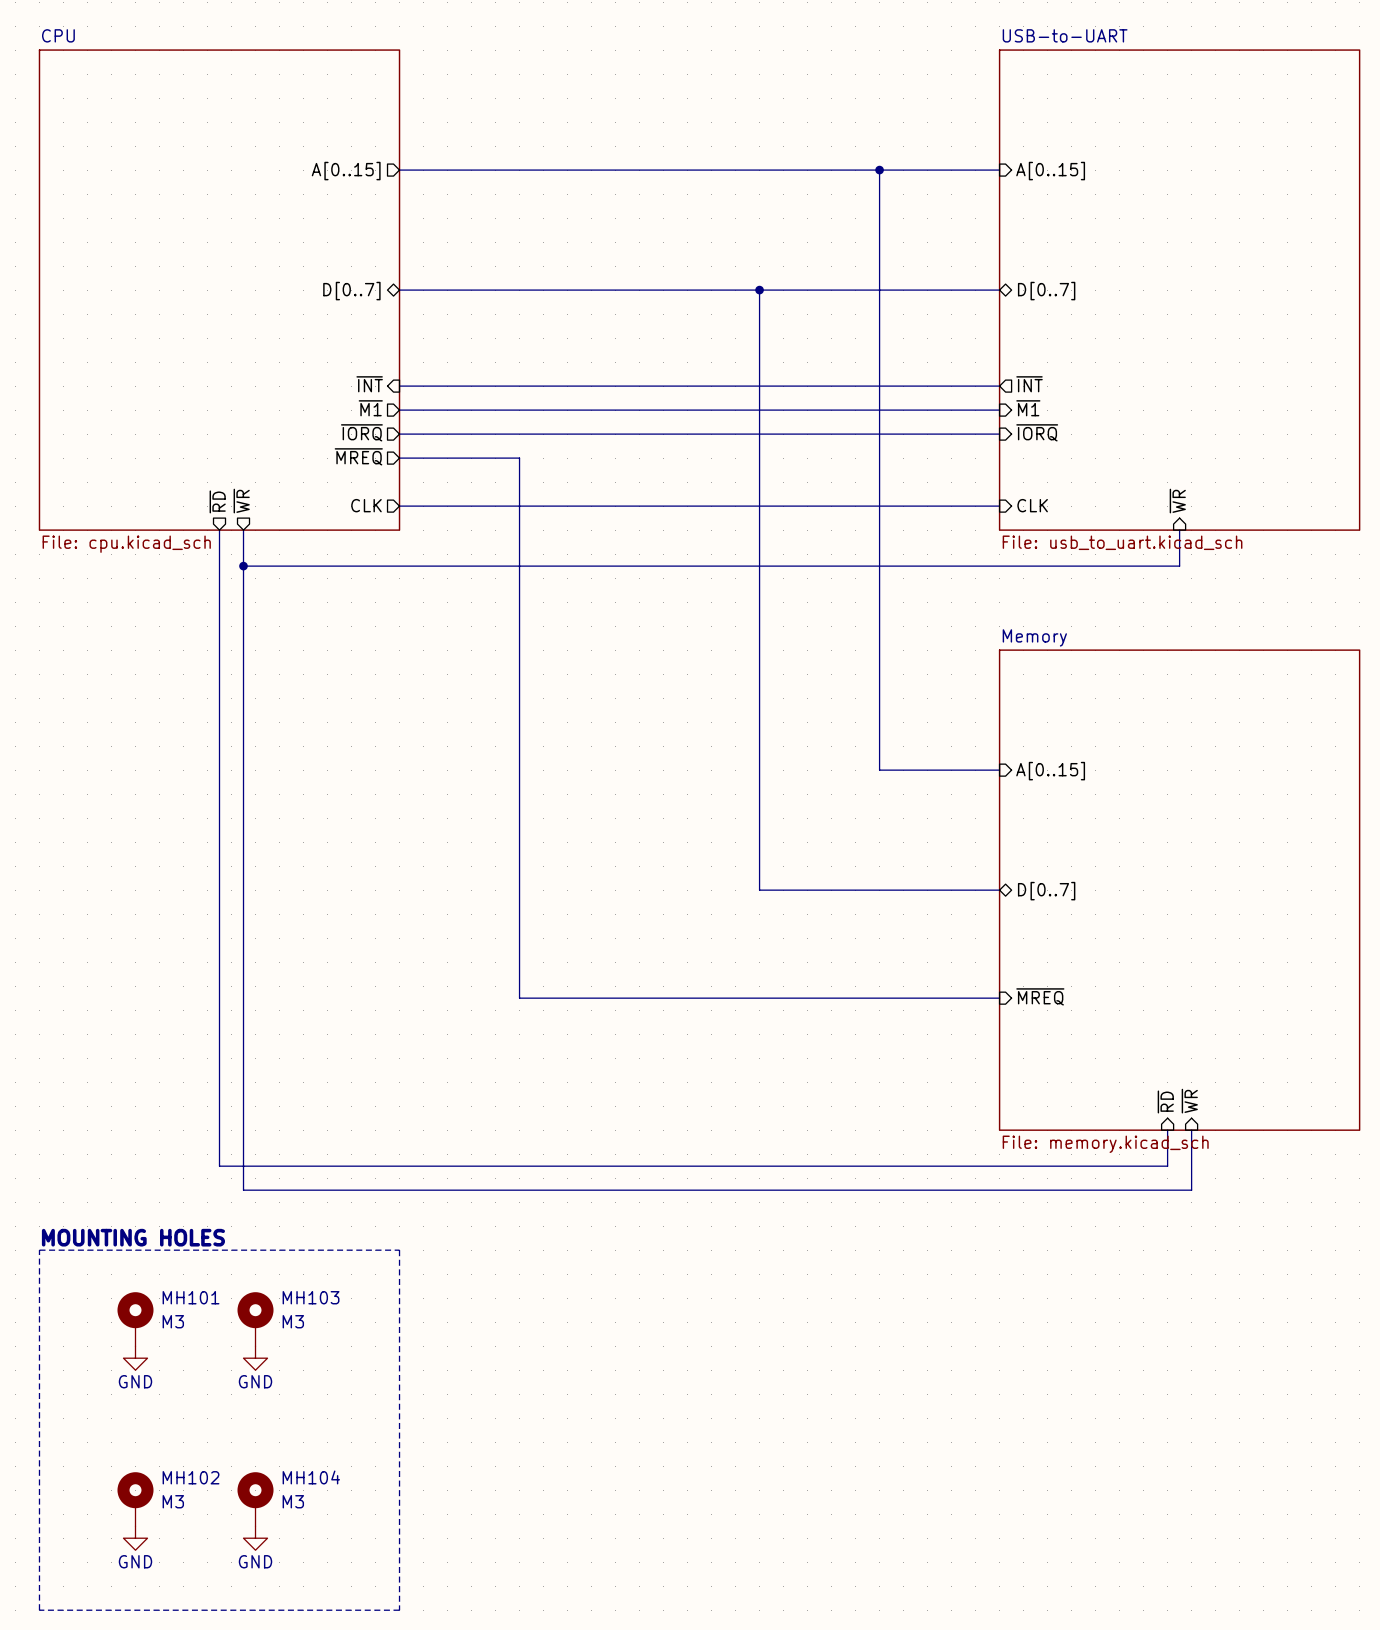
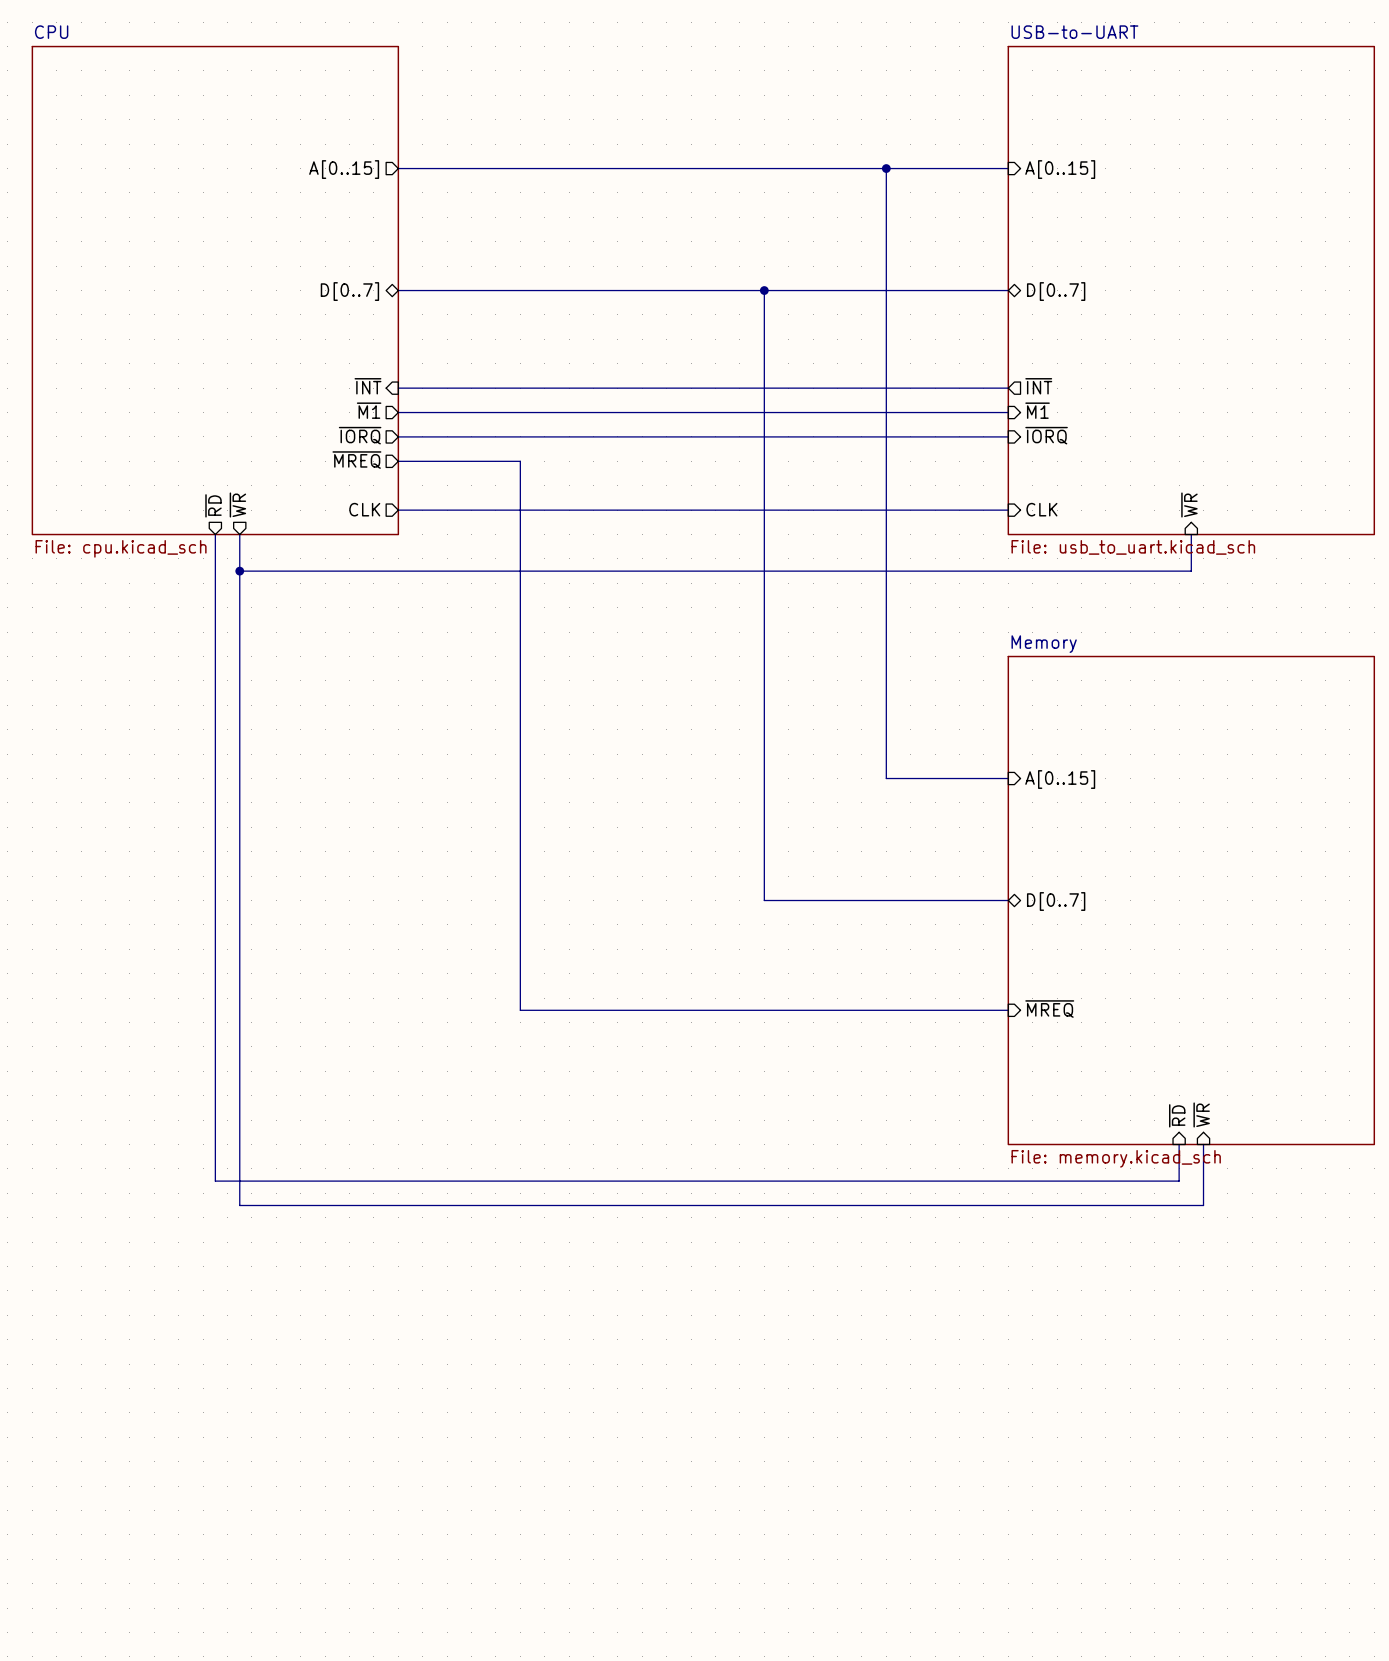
text: MOUNTING HOLES (133, 1237) -> none
line: (39, 1250) (399, 1250) (399, 1610) (39, 1610) (39, 1250) -> none
MH101: M3 (135, 1319) -> none
MH103: M3 (255, 1319) -> none
power symbol: GND (135, 1358) -> none
power symbol: GND (255, 1358) -> none
MH102: M3 (135, 1499) -> none
MH104: M3 (255, 1499) -> none
power symbol: GND (135, 1538) -> none
power symbol: GND (255, 1538) -> none

